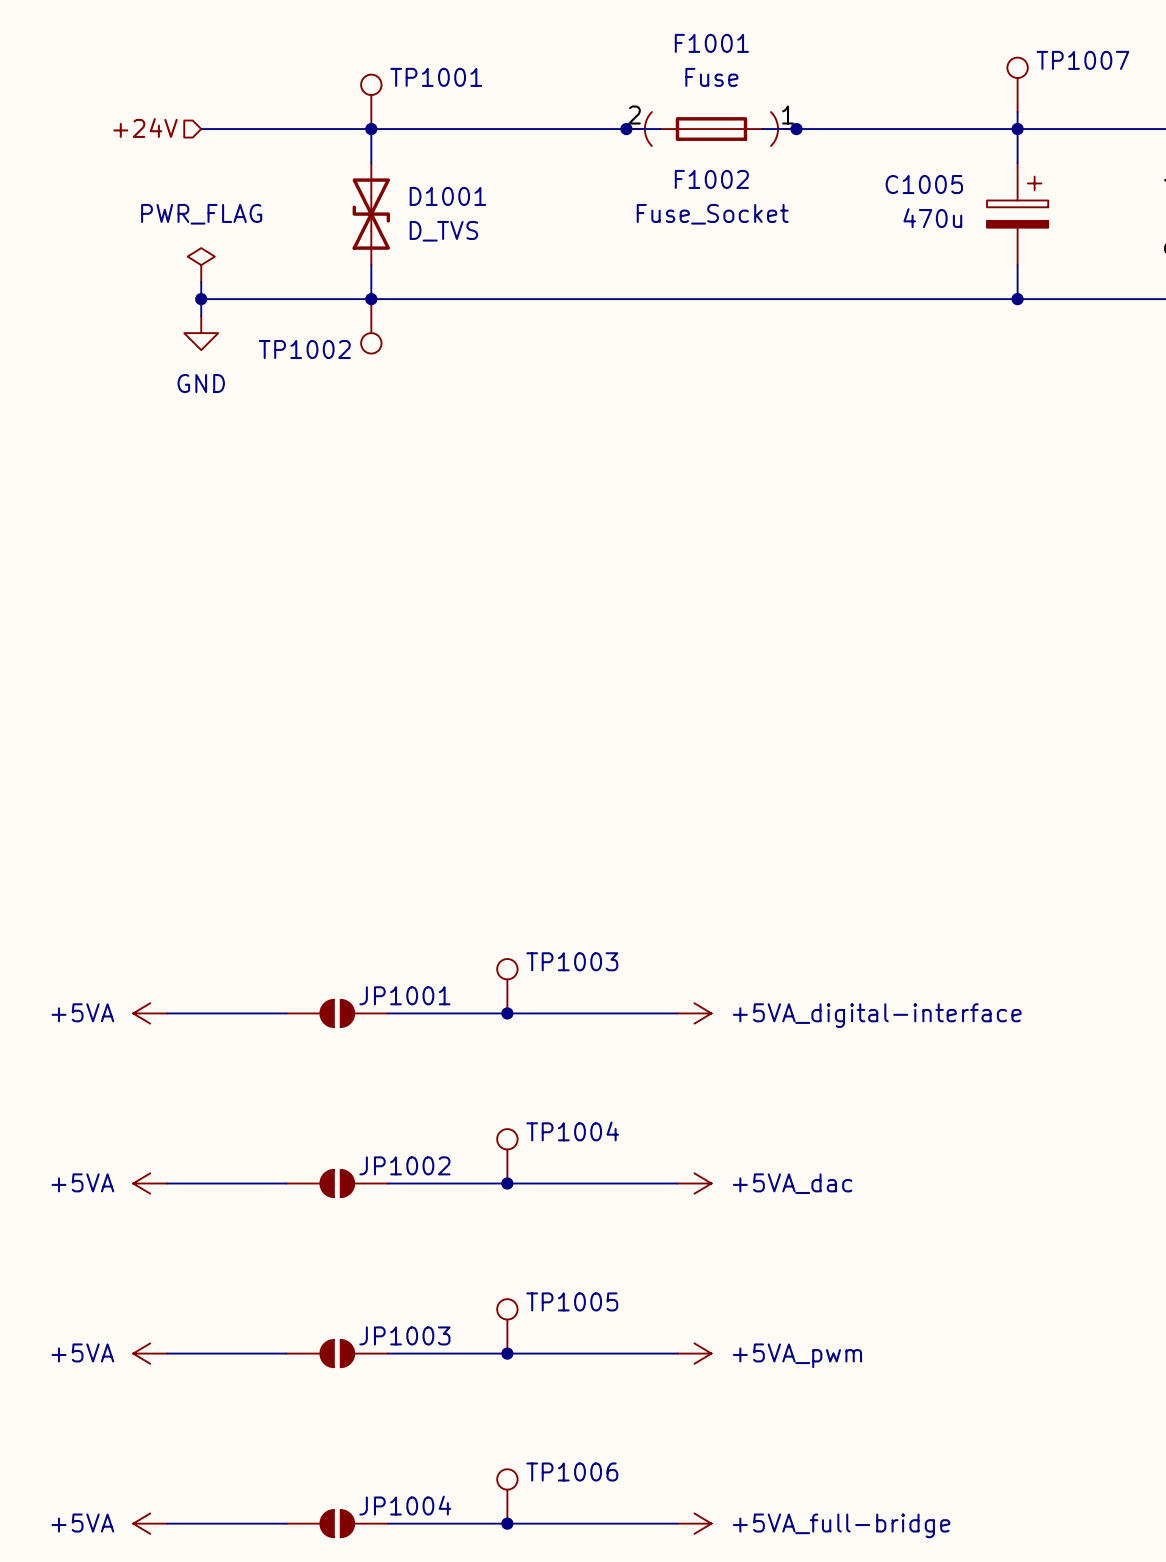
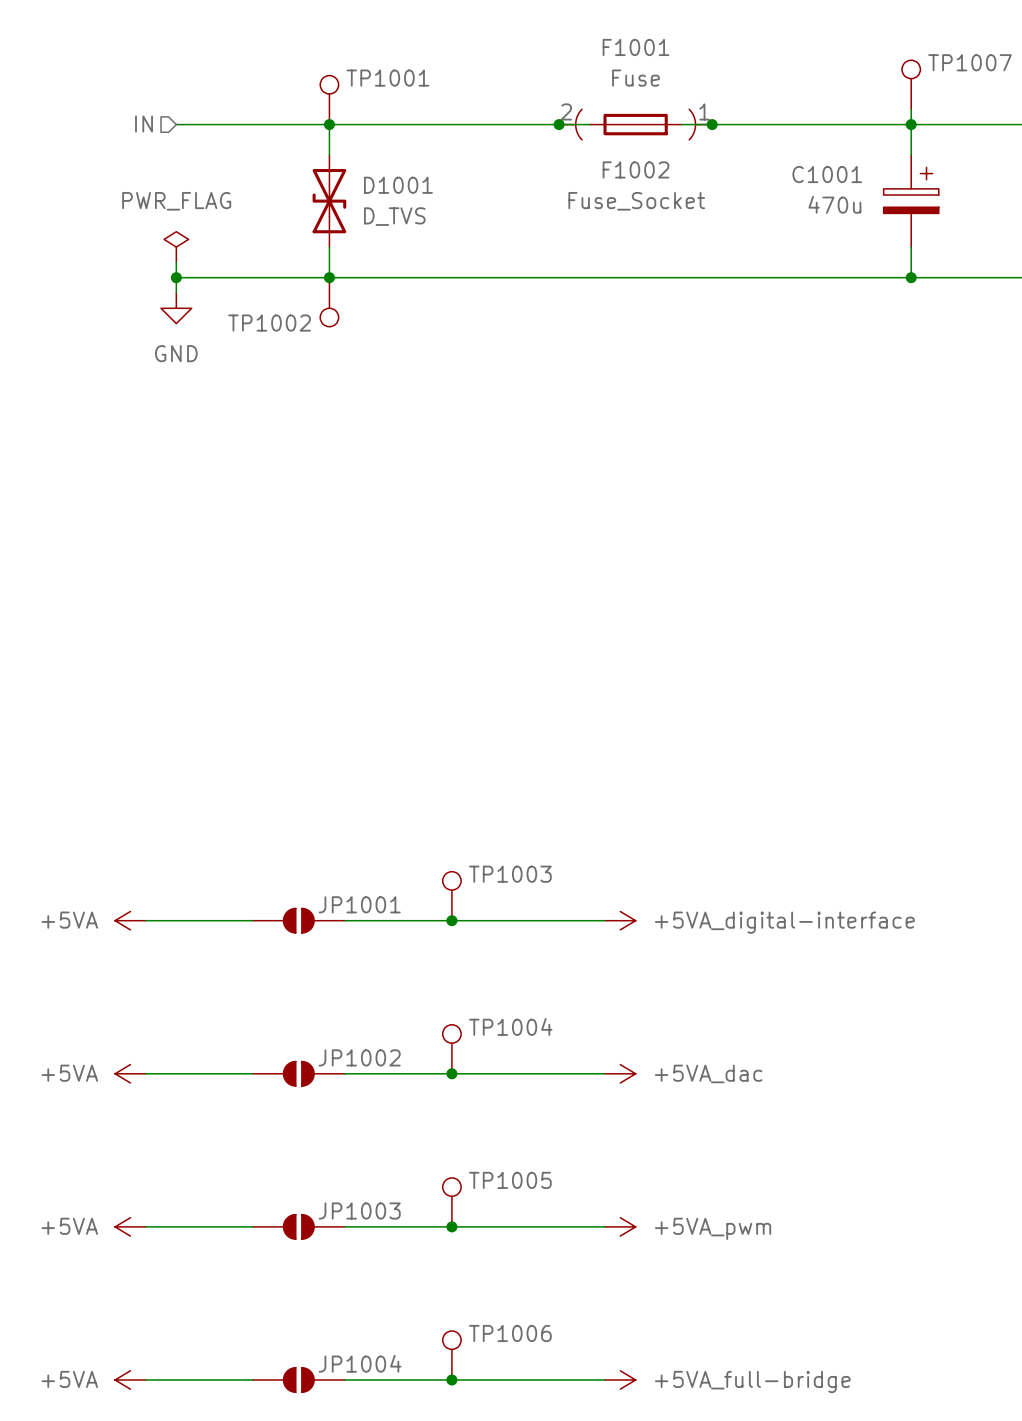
hierarchical label: +24V (145, 128) -> IN (144, 124)
C1005 name: C1005 (924, 184) -> C1001 (827, 174)

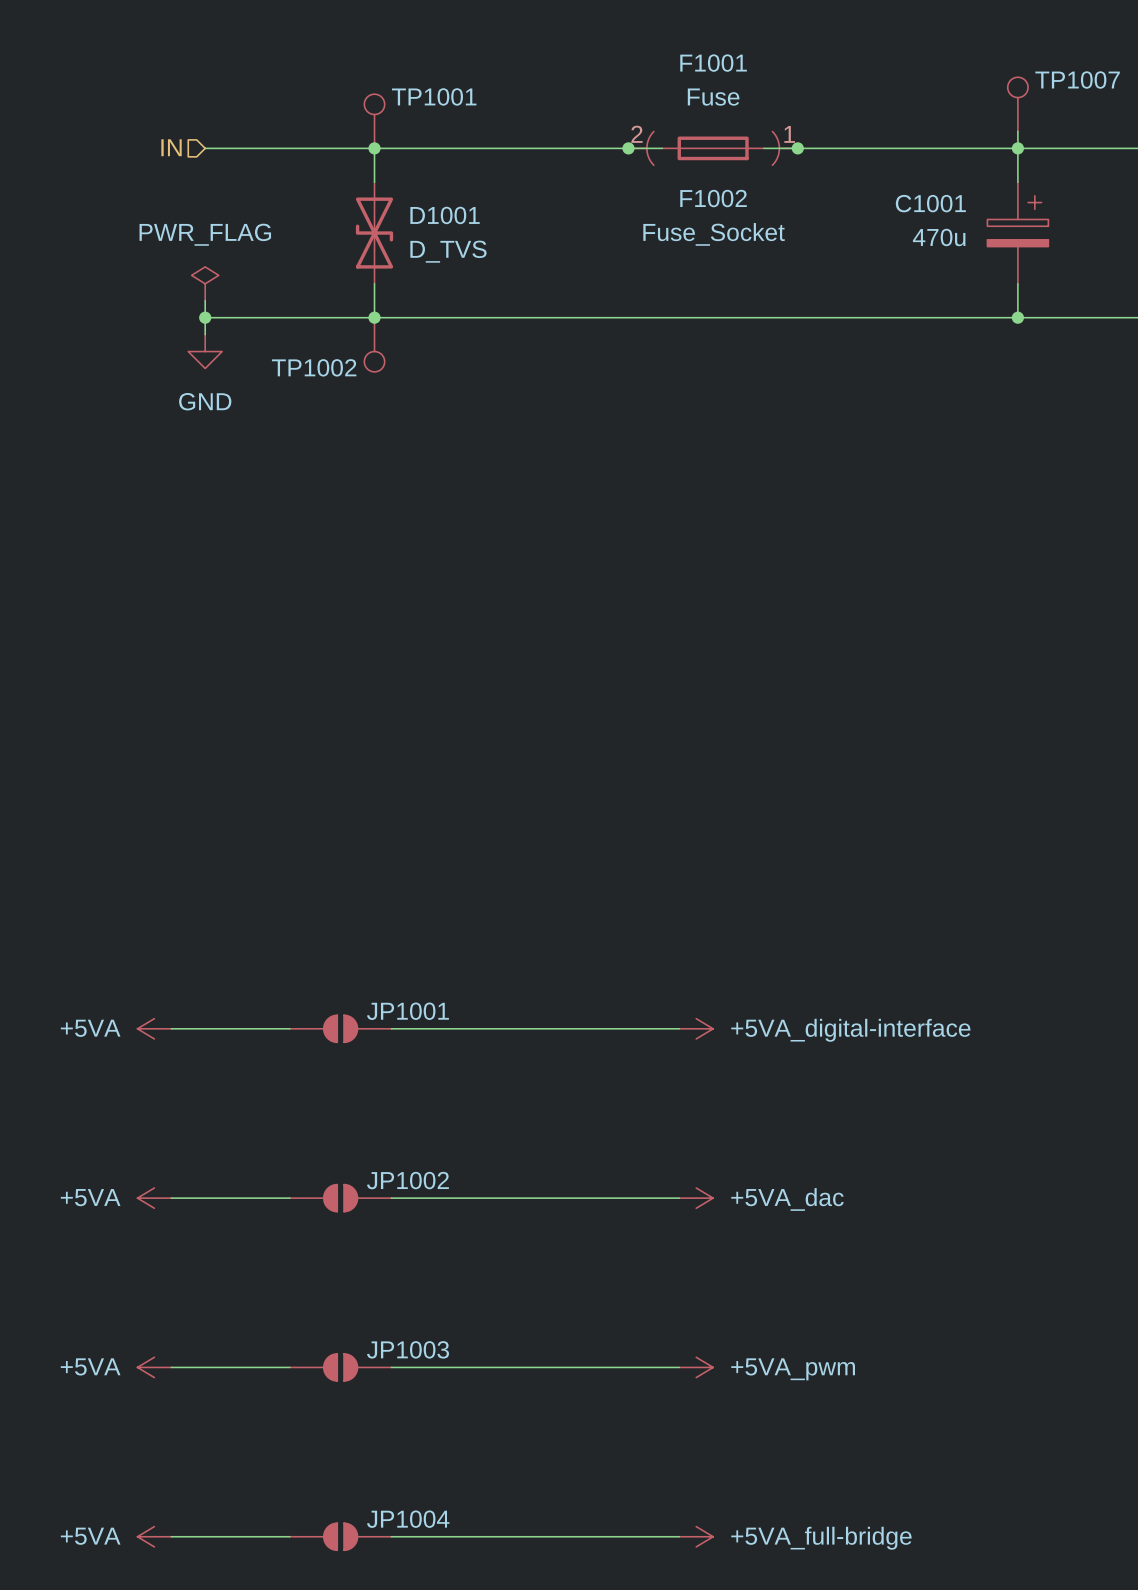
TP1003: (451, 896) -> none
junction: (451, 920) -> none
TP1004: (451, 1049) -> none
junction: (451, 1073) -> none
TP1005: (451, 1202) -> none
junction: (451, 1226) -> none
TP1006: (451, 1355) -> none
junction: (451, 1379) -> none

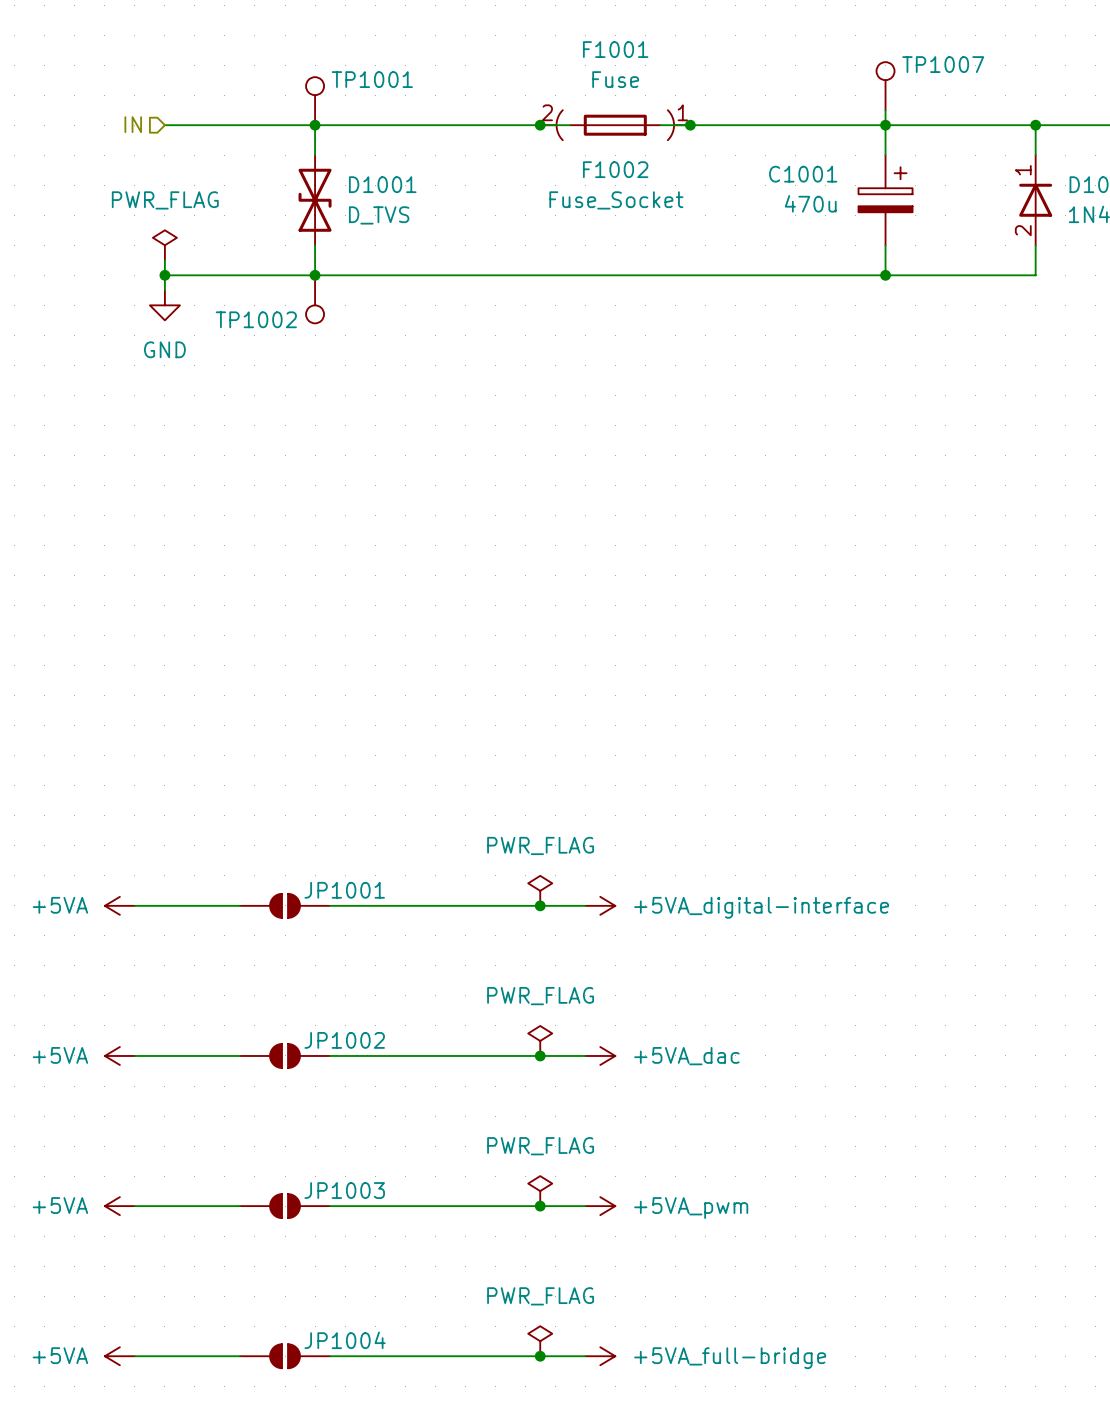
power symbol: none -> PWR_FLAG (540, 890)
junction: none -> (540, 905)
power symbol: none -> PWR_FLAG (540, 1040)
junction: none -> (540, 1055)
power symbol: none -> PWR_FLAG (540, 1191)
junction: none -> (540, 1206)
power symbol: none -> PWR_FLAG (540, 1341)
junction: none -> (540, 1356)

